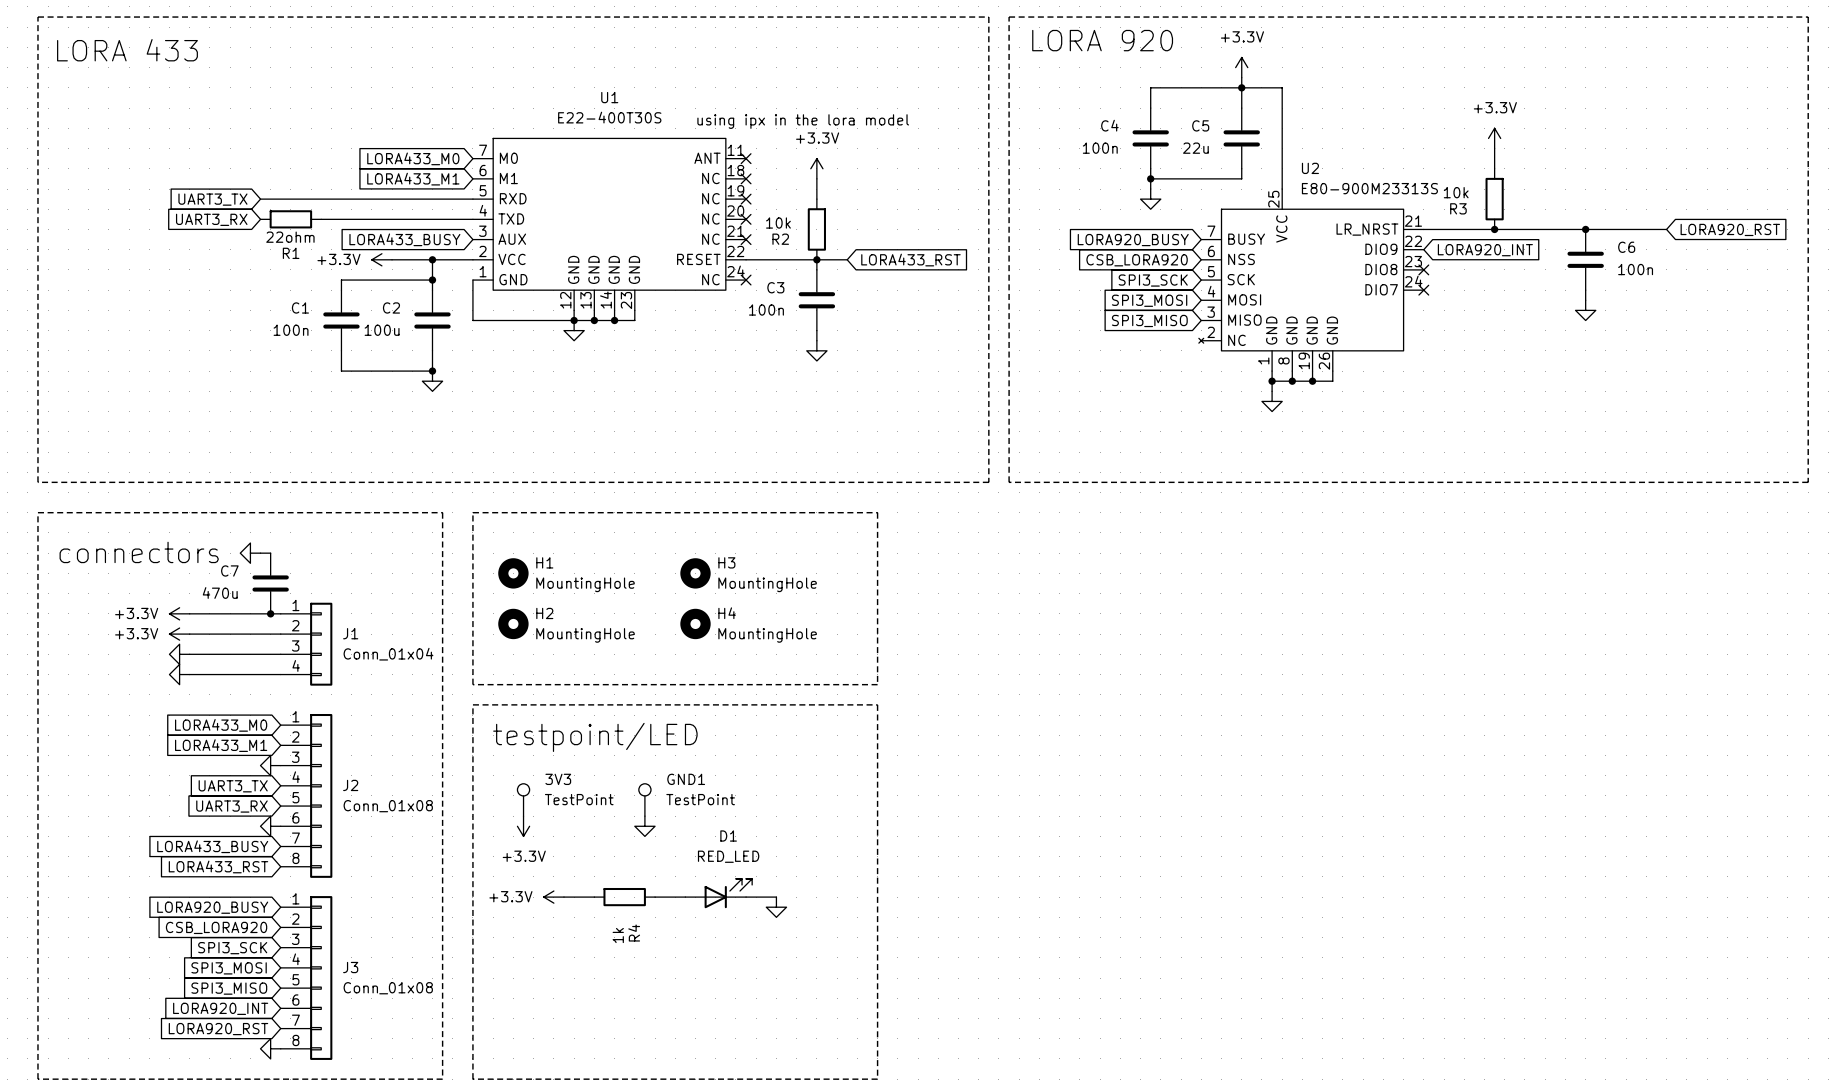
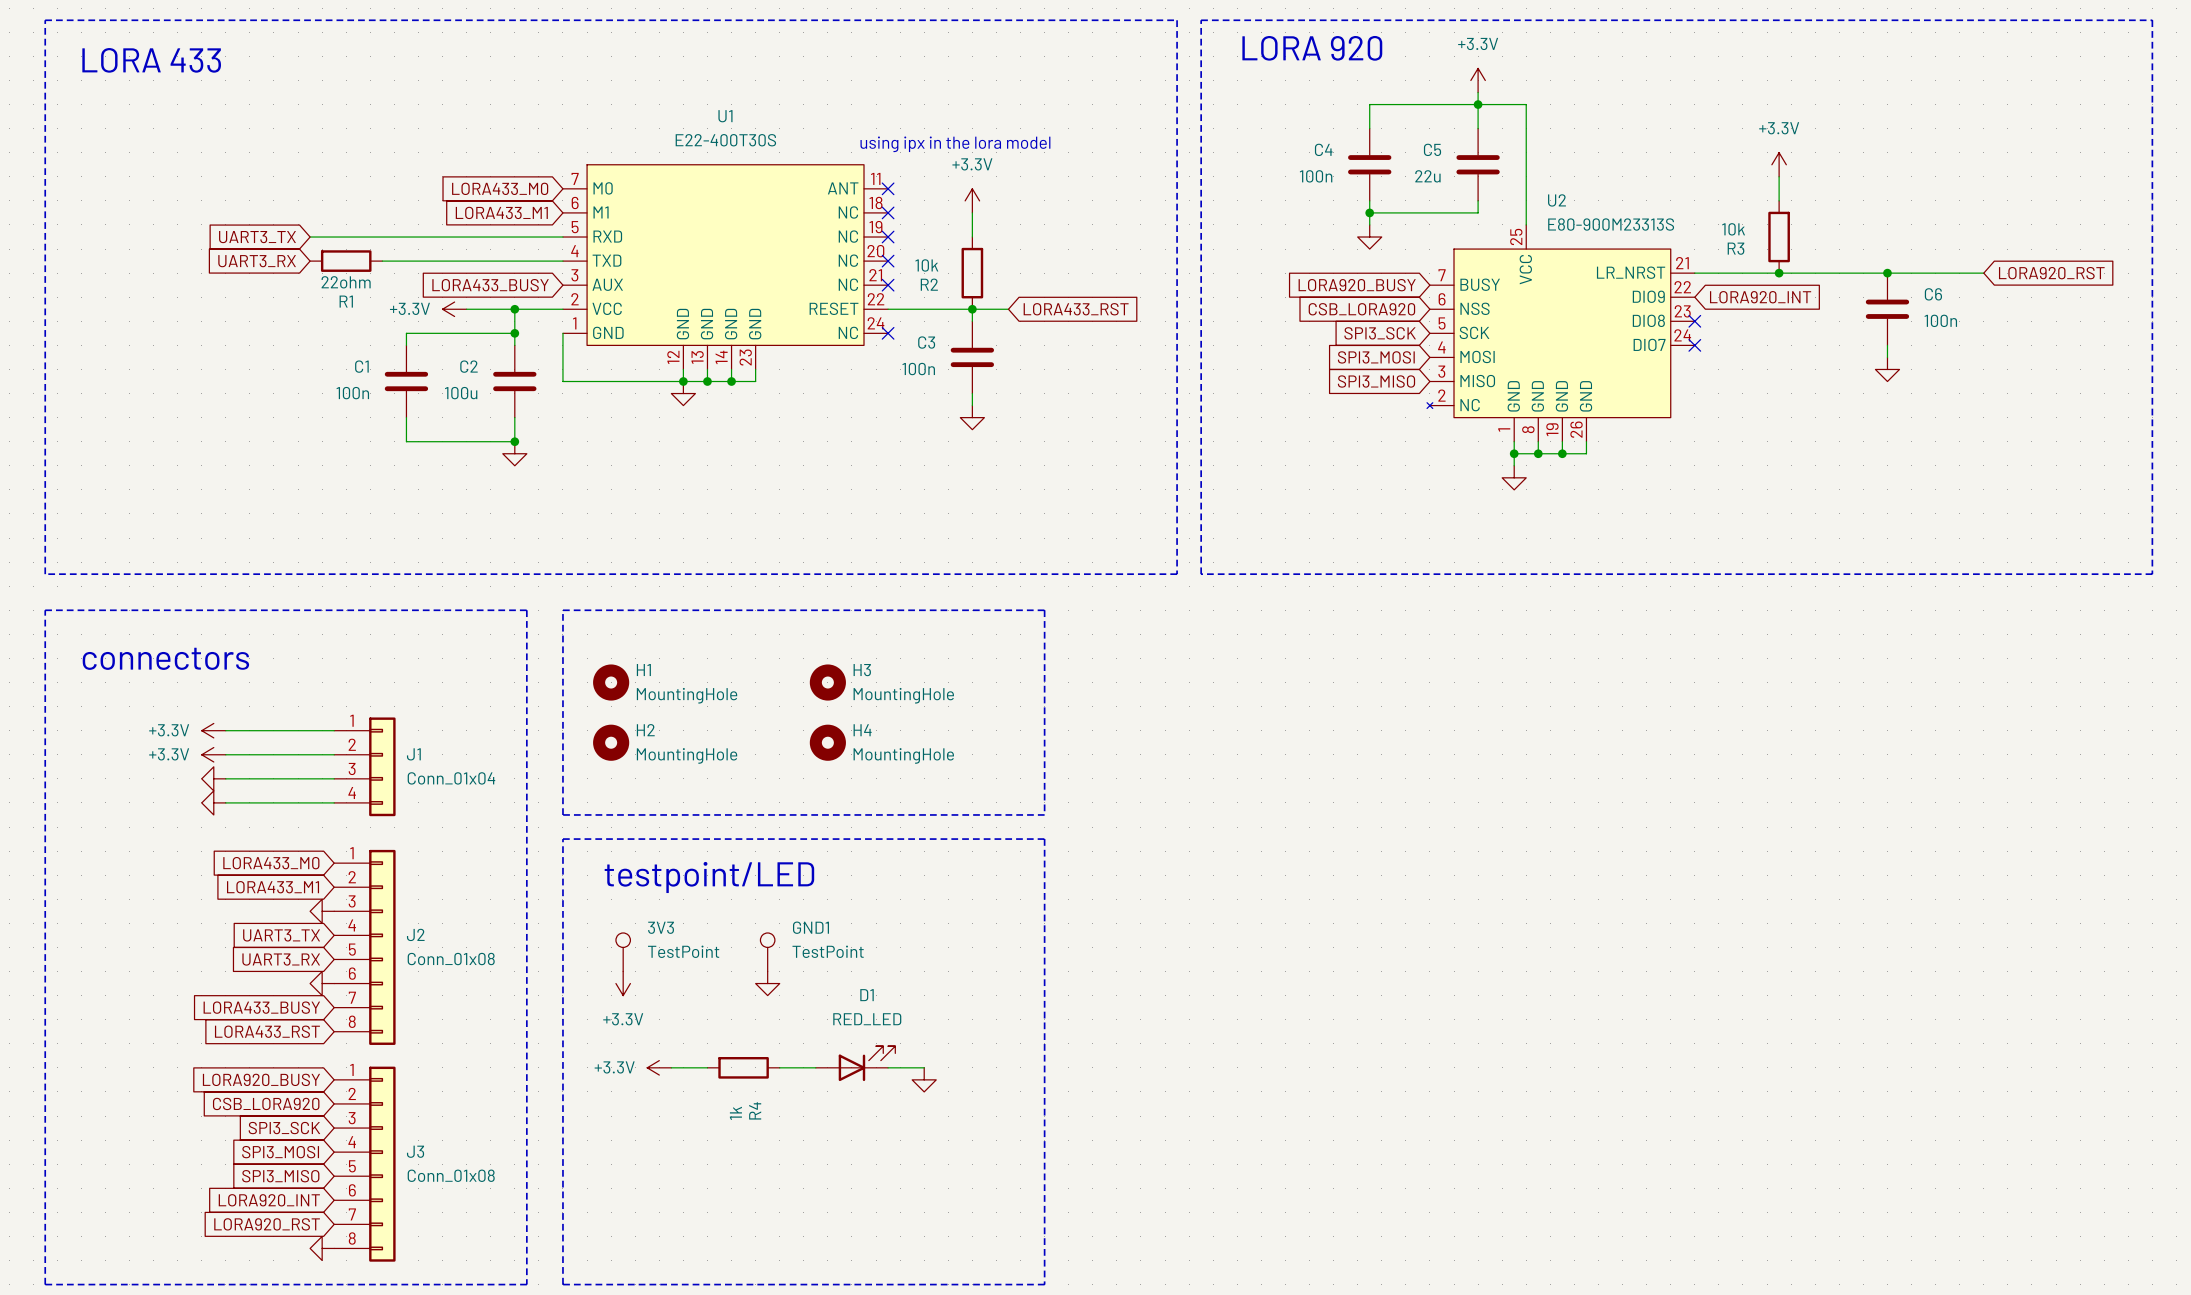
power symbol: (250, 553) -> none
wire: (260, 553) (270, 553) -> none
C7: 470u (270, 583) -> none
junction: (270, 613) -> none

